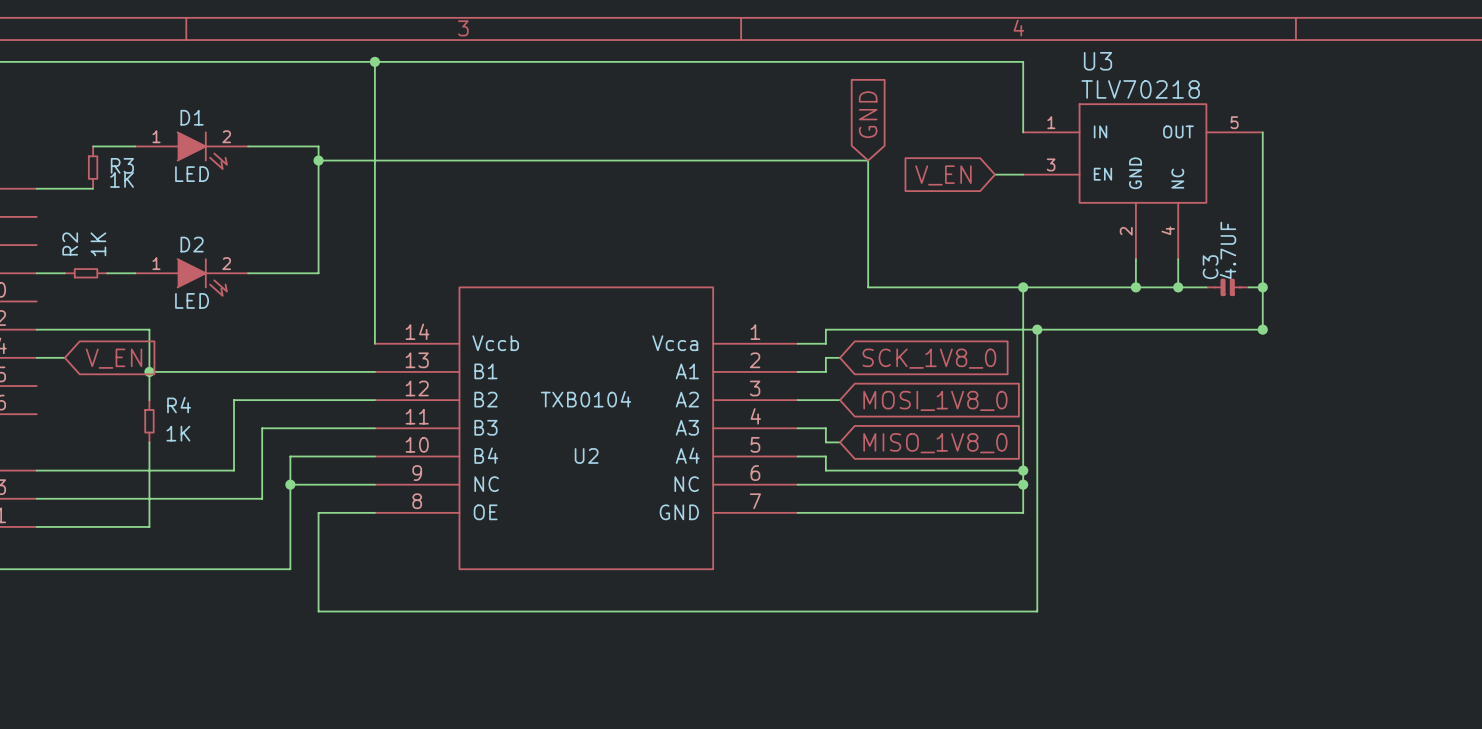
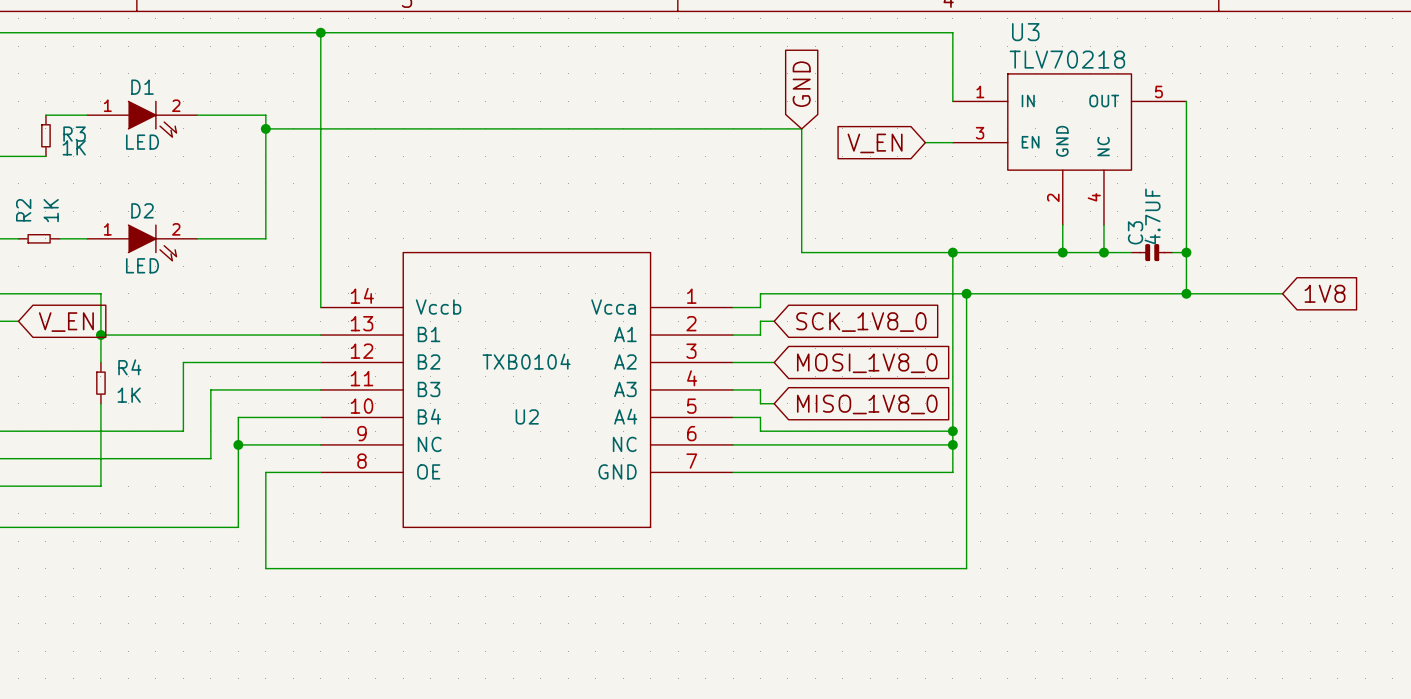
wire: none -> (1186, 293) (1282, 293)
global label: none -> 1V8 (1325, 293)

